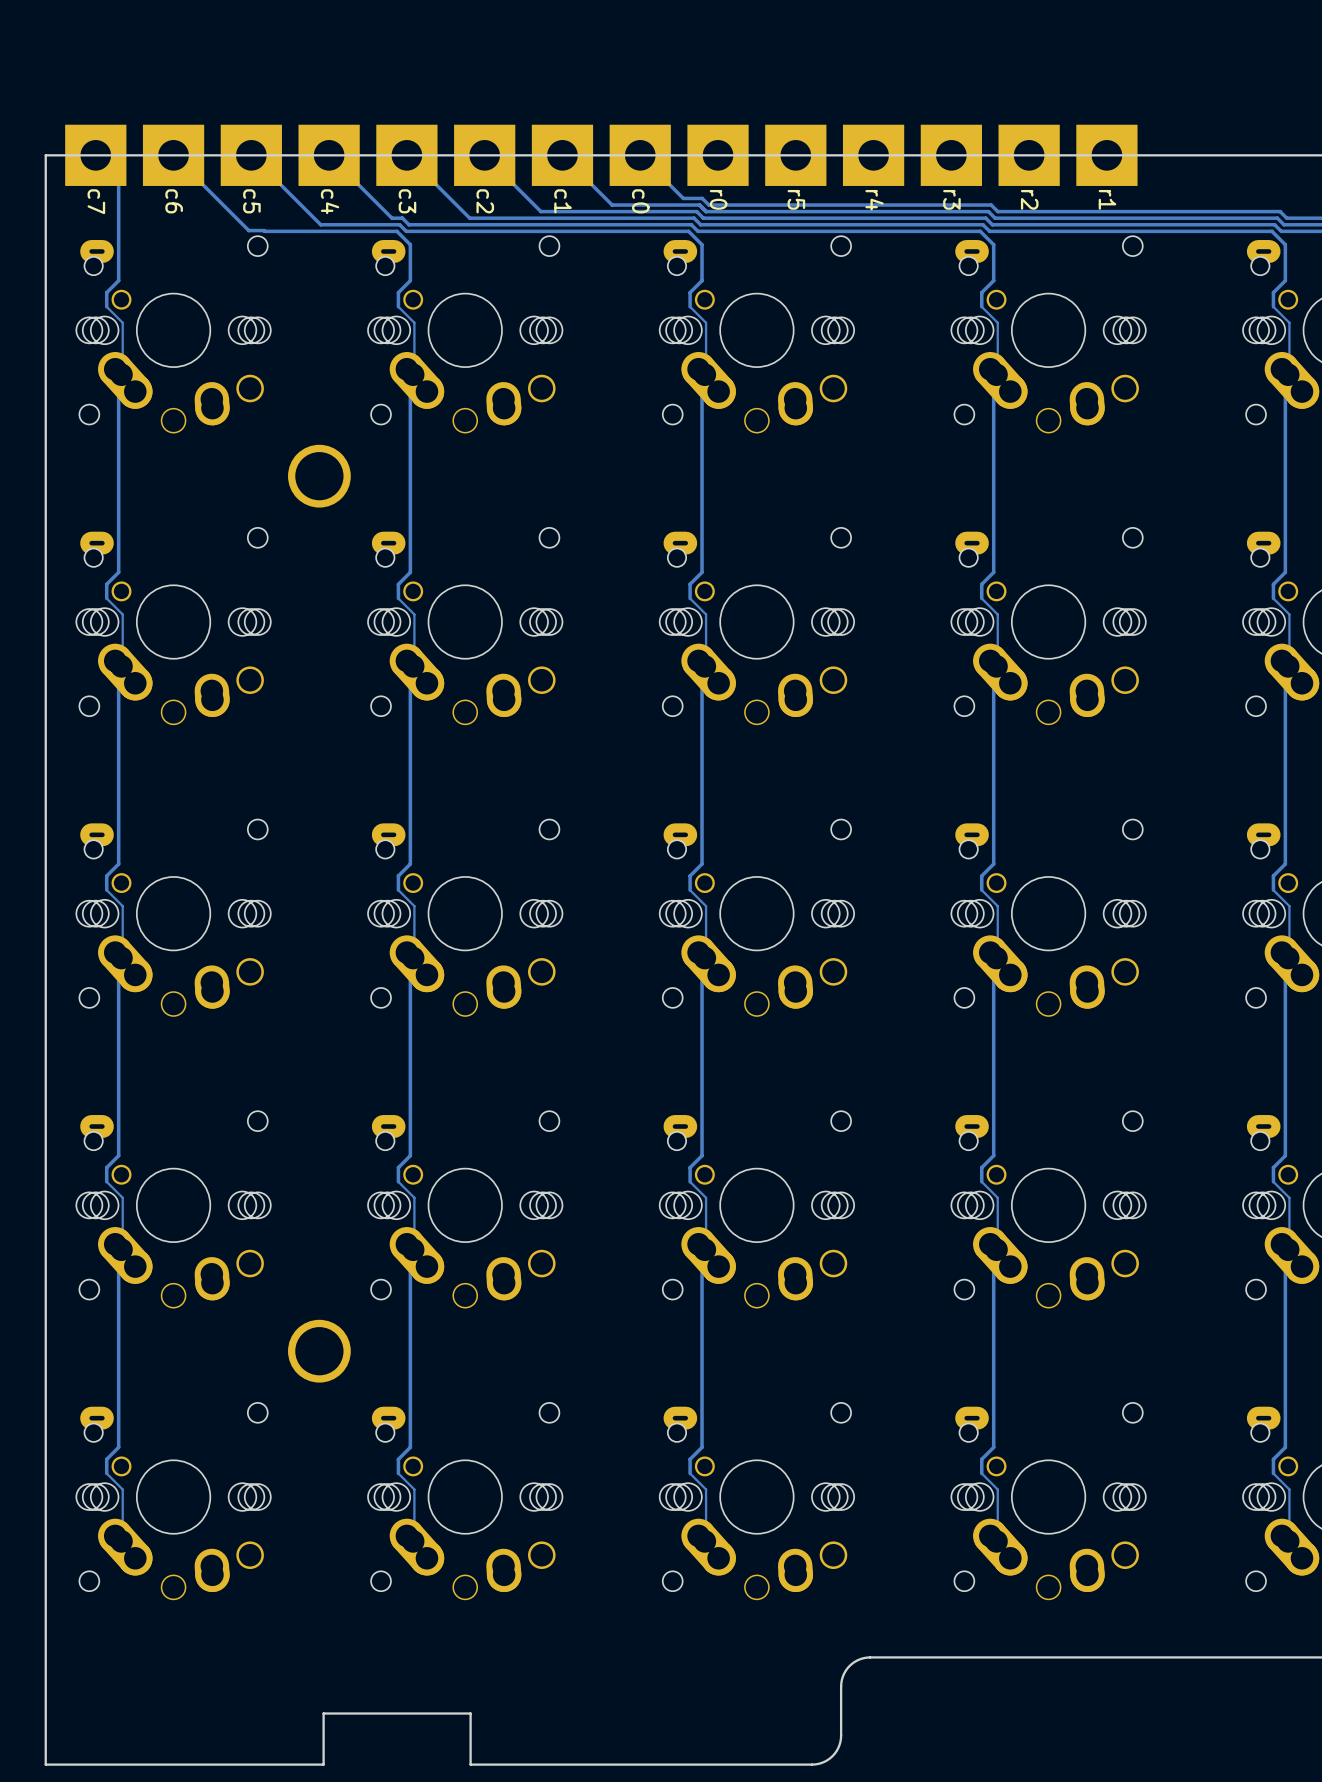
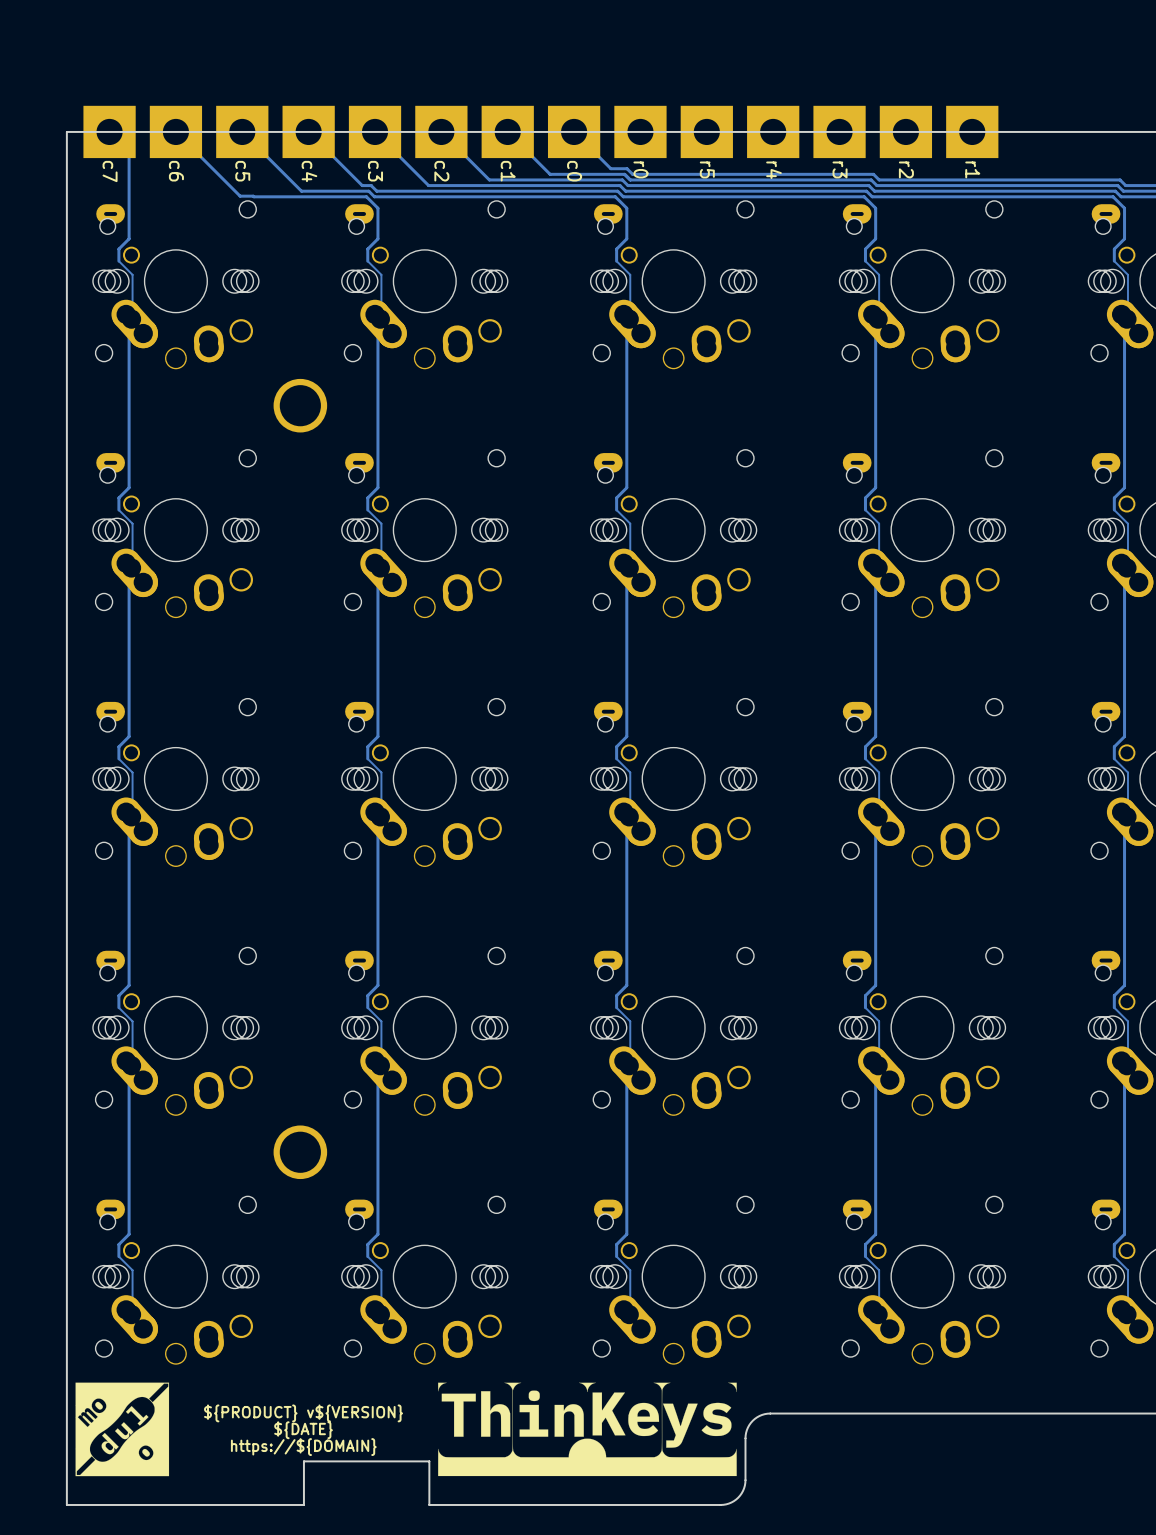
drawing: none -> [75, 1382, 170, 1477]
drawing: none -> [438, 1382, 737, 1477]
text: none -> ${PRODUCT} v${VERSION} (303, 1413)
text: none -> ${DATE} (303, 1430)
text: none -> https://${DOMAIN} (303, 1447)

